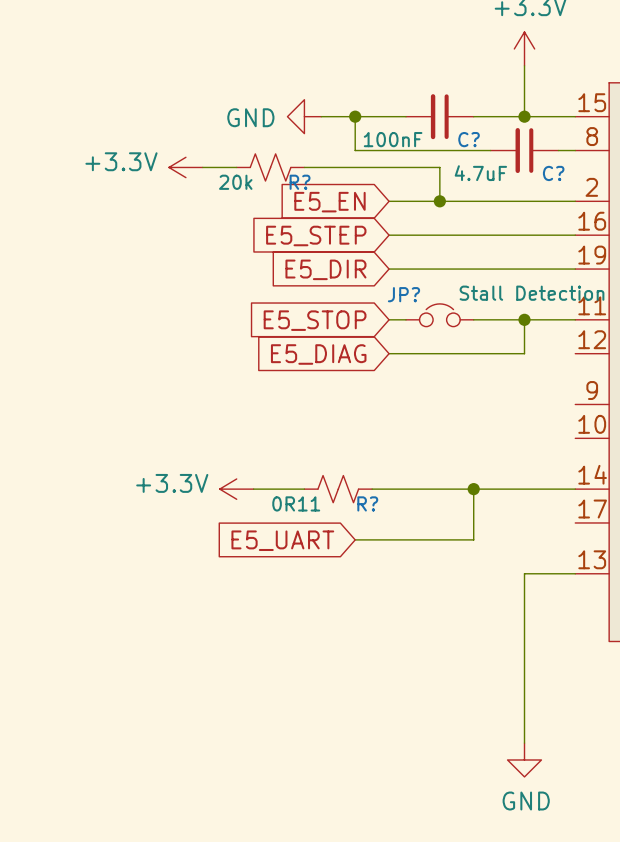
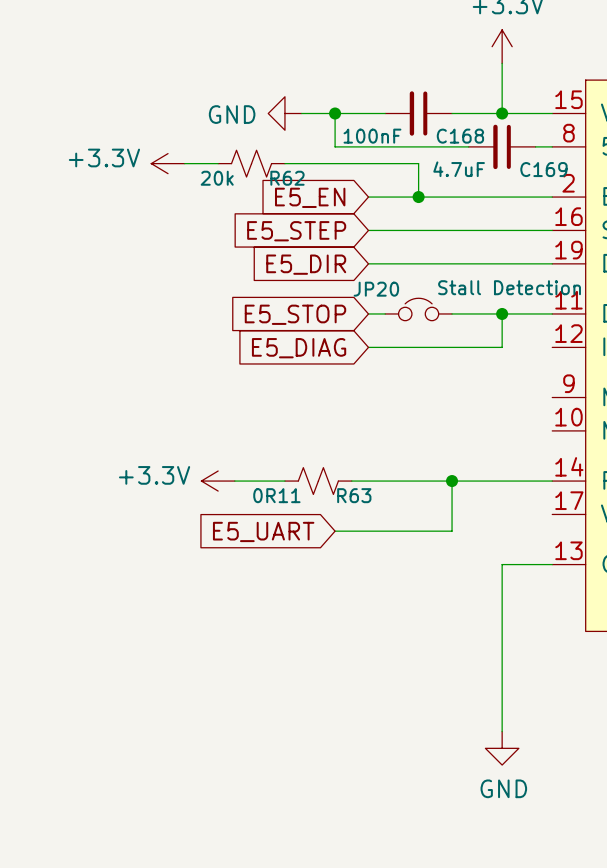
C? name: C? (469, 139) -> C168 (460, 136)
C? name: C? (553, 173) -> C169 (543, 169)
R? name: R? (300, 182) -> R62 (287, 178)
JP? name: JP? (403, 294) -> JP20 (376, 289)
R? name: R? (367, 503) -> R63 (354, 495)

